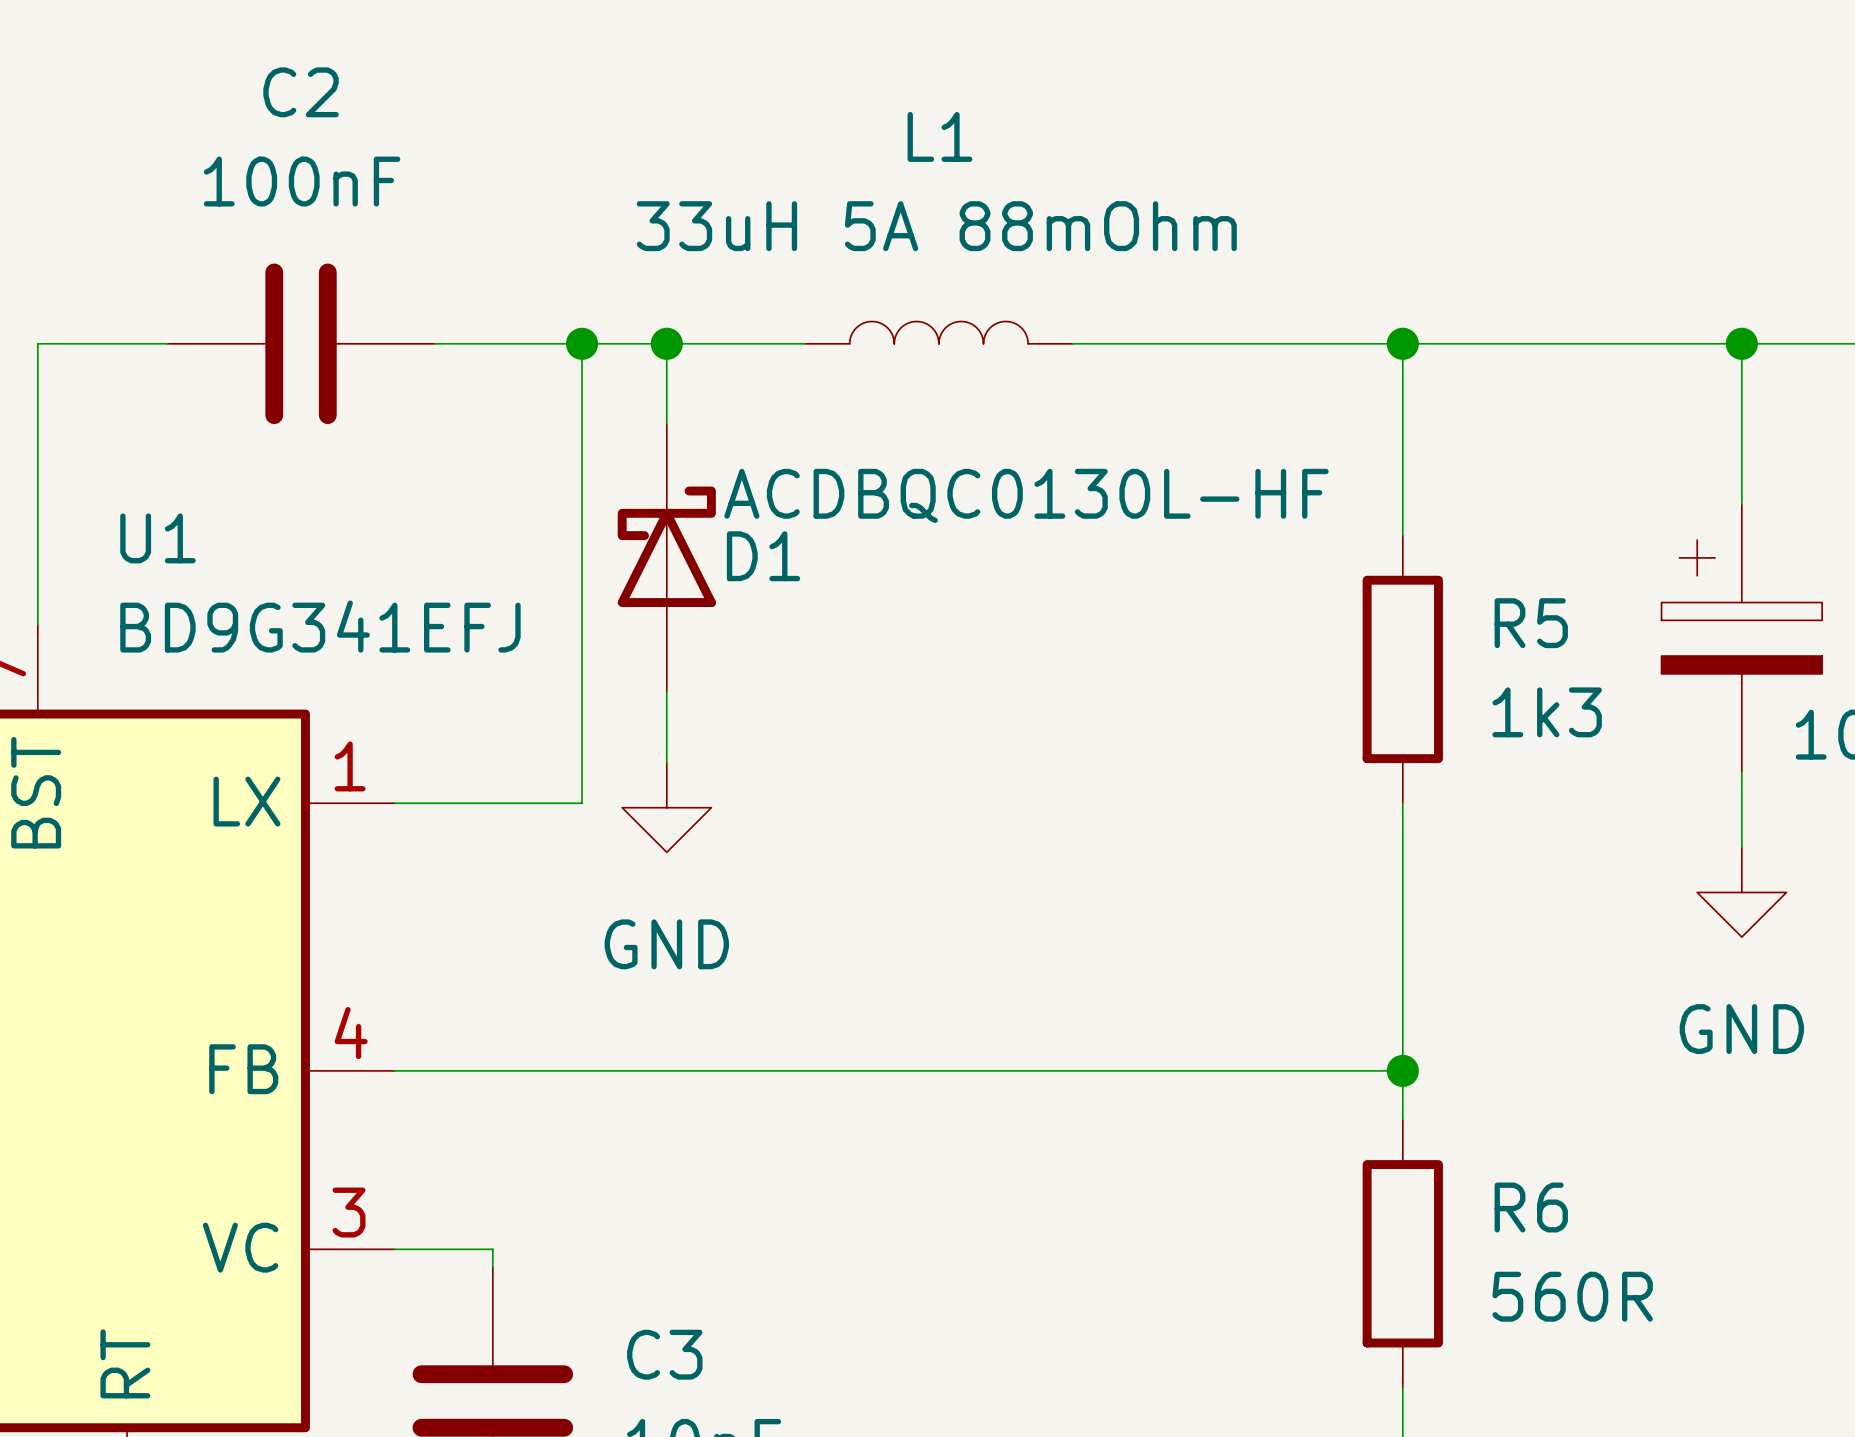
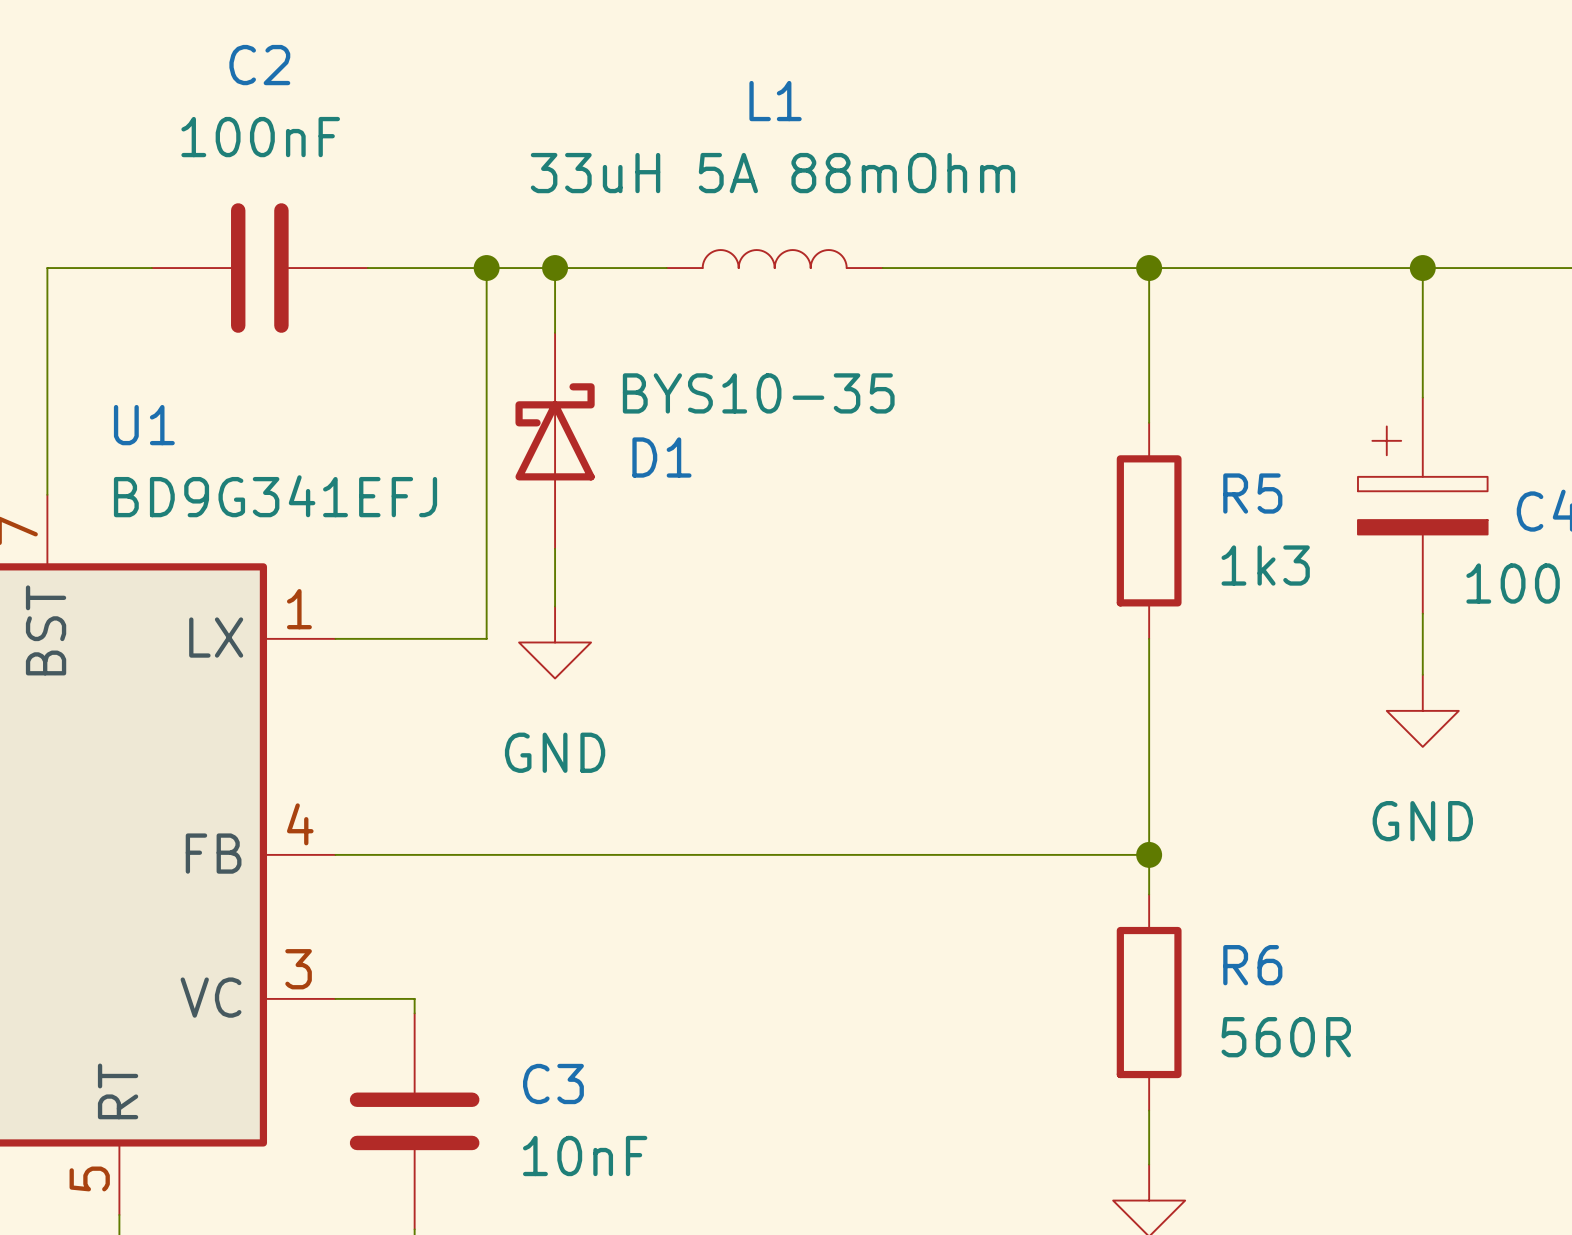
D1 value: ACDBQC0130L-HF (1026, 495) -> BYS10-35 (758, 393)
D1 name position: D1 (763, 556) -> D1 (661, 457)

